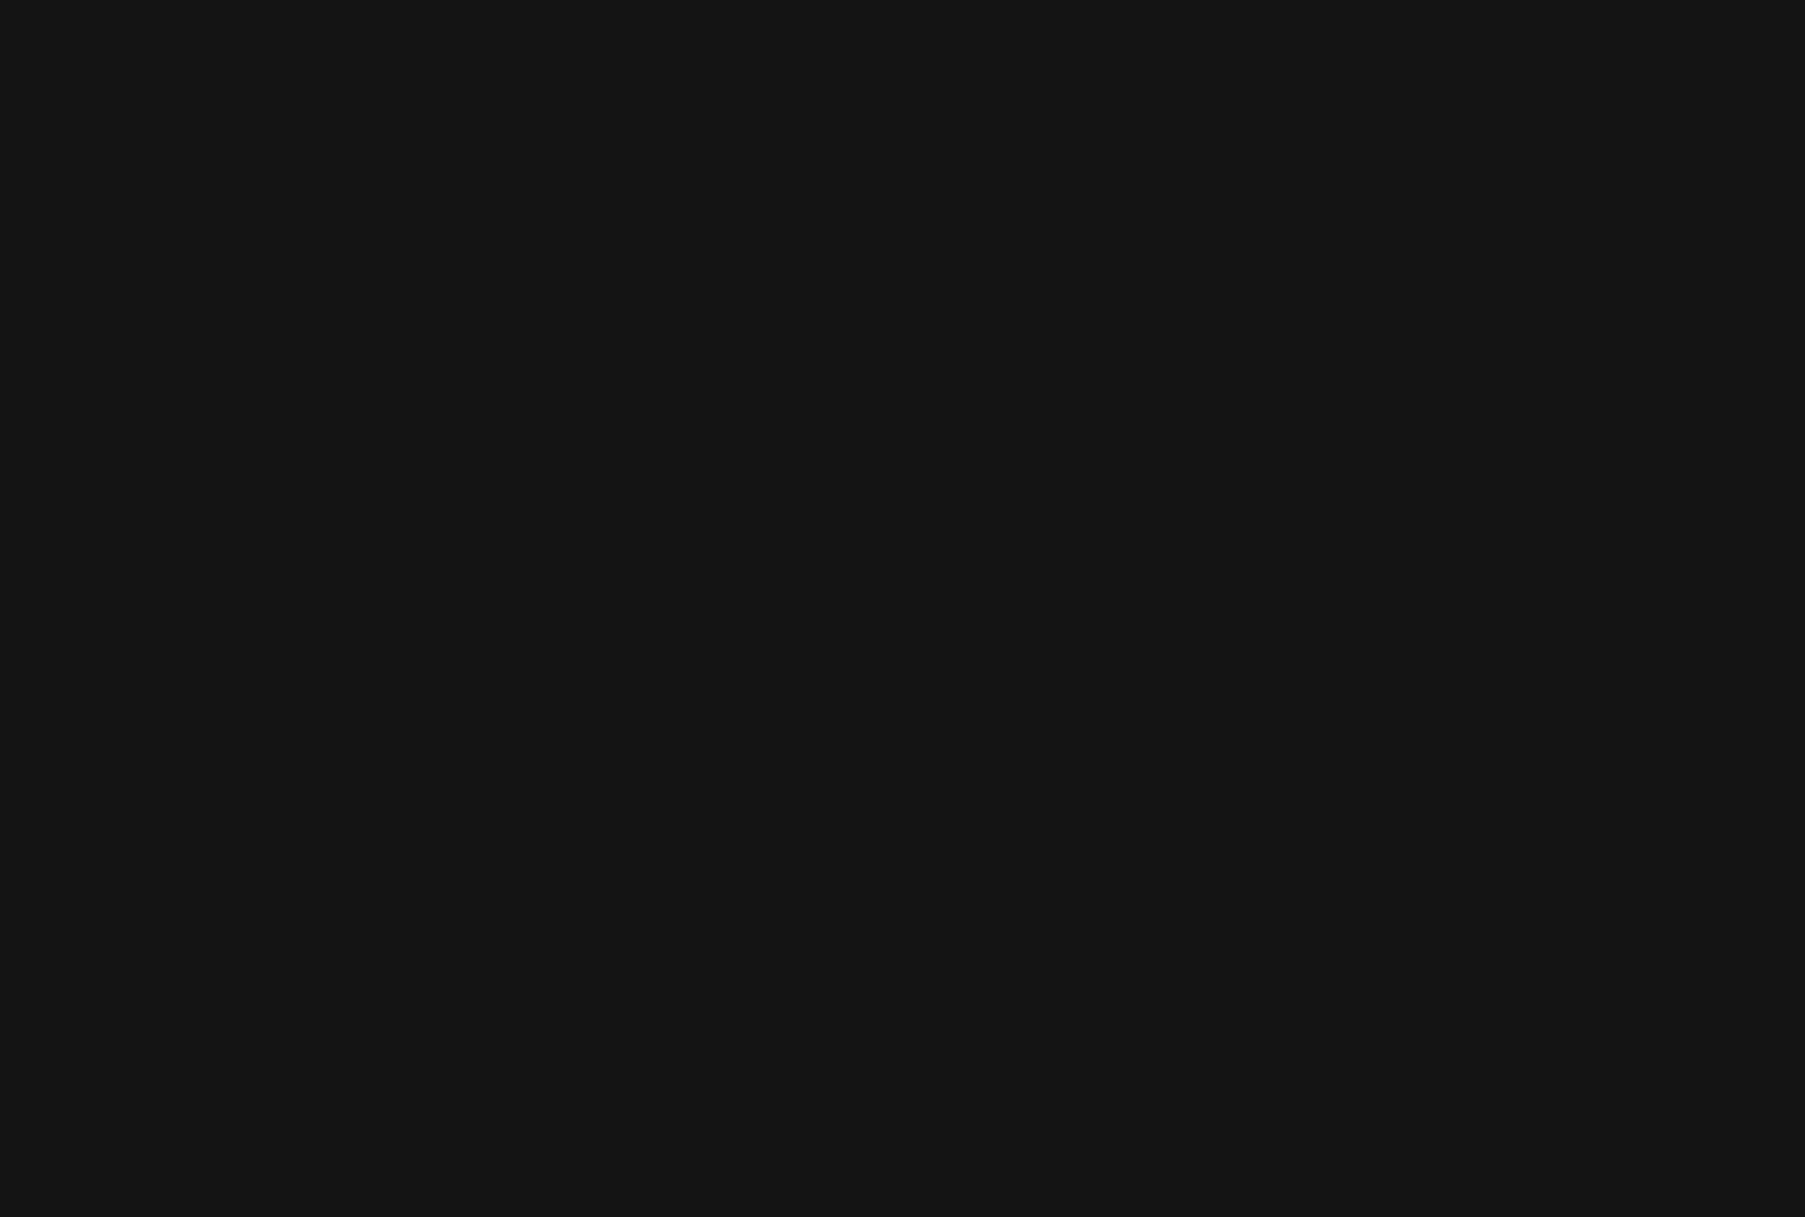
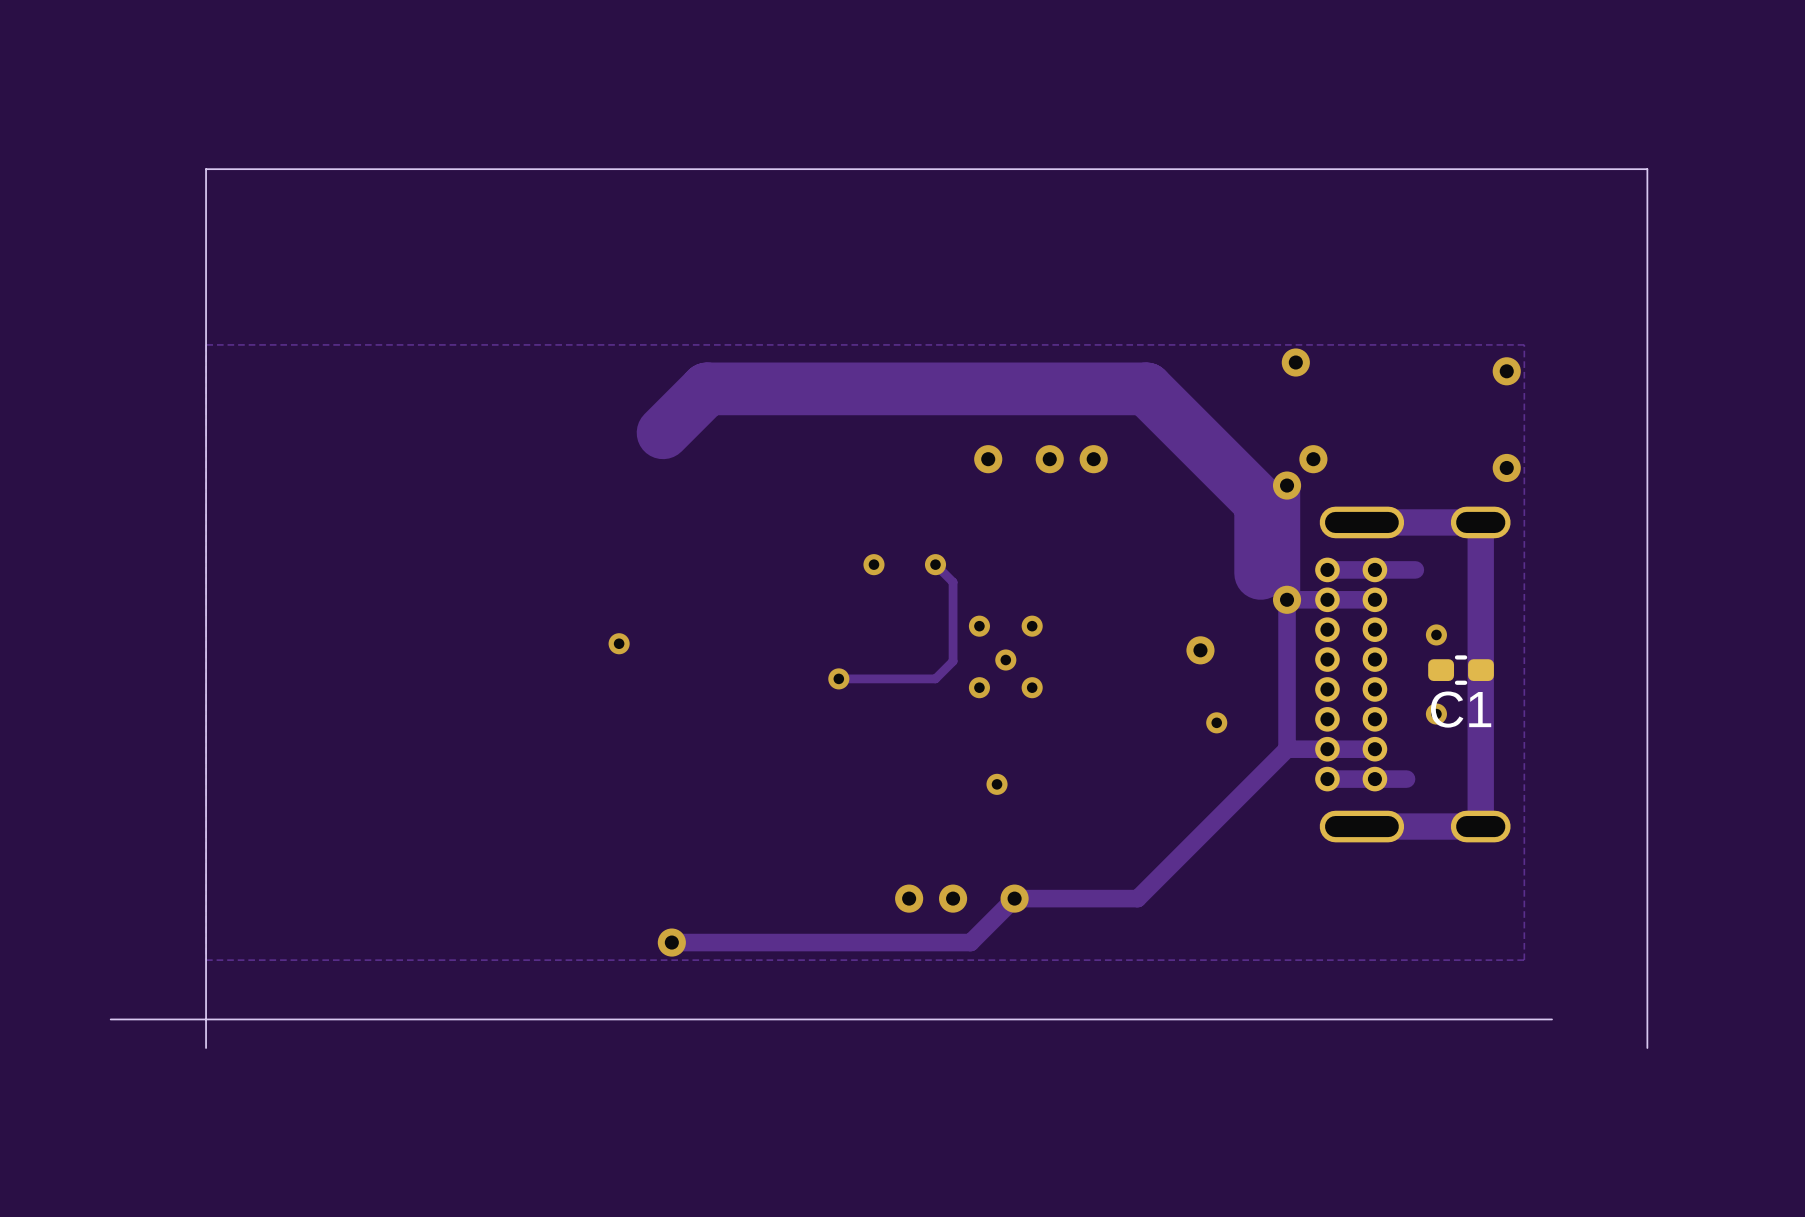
zone outline: none -> (1524, 344) (1524, 960) (206, 960) (206, 344) (1524, 344)
via: none -> (1295, 362)
via: none -> (1506, 371)
track: none -> (663, 432) (706, 388) (1146, 388) (1260, 503) (1260, 573)
via: none -> (988, 459)
via: none -> (1049, 459)
via: none -> (1093, 459)
via: none -> (1313, 459)
via: none -> (1506, 467)
track: none -> (1287, 485) (1287, 599)
via: none -> (1287, 485)
track: none -> (1361, 522) (1480, 522) (1480, 826) (1361, 826)
via: none -> (873, 564)
track: none -> (935, 564) (953, 582) (953, 661) (935, 678) (838, 678)
via: none -> (935, 564)
track: none -> (1415, 569) (1327, 569)
track: none -> (1287, 599) (1287, 749)
via: none -> (1287, 599)
track: none -> (1374, 599) (1287, 599)
via: none -> (979, 626)
via: none -> (1032, 626)
via: none -> (1436, 634)
via: none -> (619, 643)
via: none -> (1200, 650)
via: none -> (1005, 660)
C1: none -> (1461, 670)
part: none -> (1412, 674)
via: none -> (838, 678)
via: none -> (979, 687)
via: none -> (1032, 687)
via: none -> (1436, 714)
via: none -> (1216, 722)
track: none -> (1287, 749) (1137, 898) (1014, 898) (970, 942) (671, 942)
track: none -> (1374, 749) (1287, 749)
track: none -> (1406, 779) (1327, 779)
via: none -> (997, 784)
via: none -> (909, 898)
via: none -> (953, 898)
via: none -> (1014, 898)
via: none -> (671, 942)
board edge: none -> (1552, 1019) (110, 1019)
board edge: none -> (1647, 1048) (1647, 169) (206, 169) (206, 1048)

